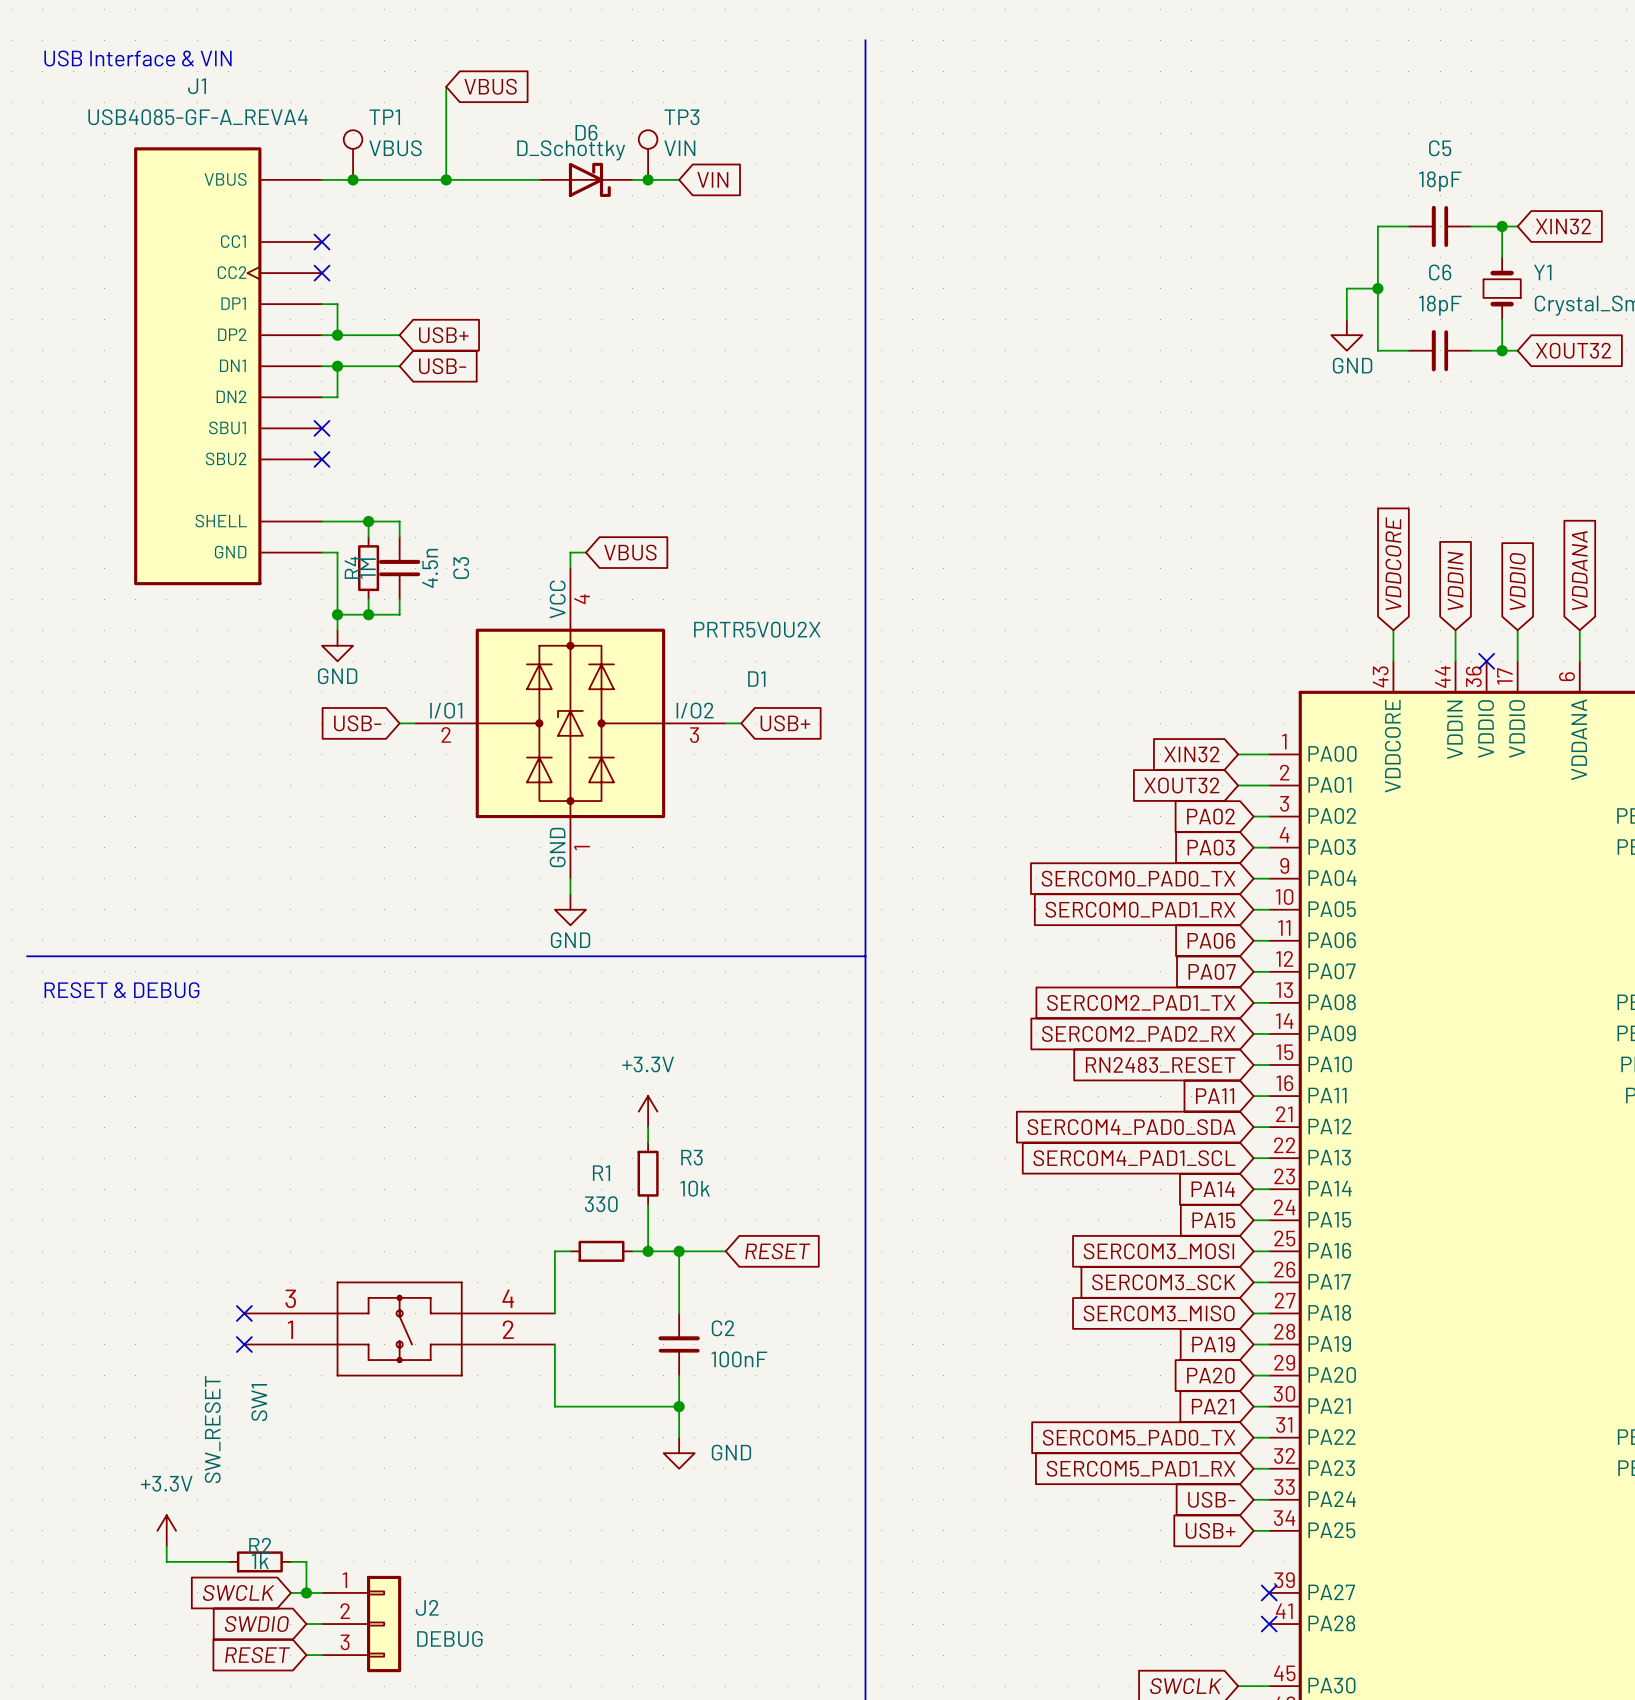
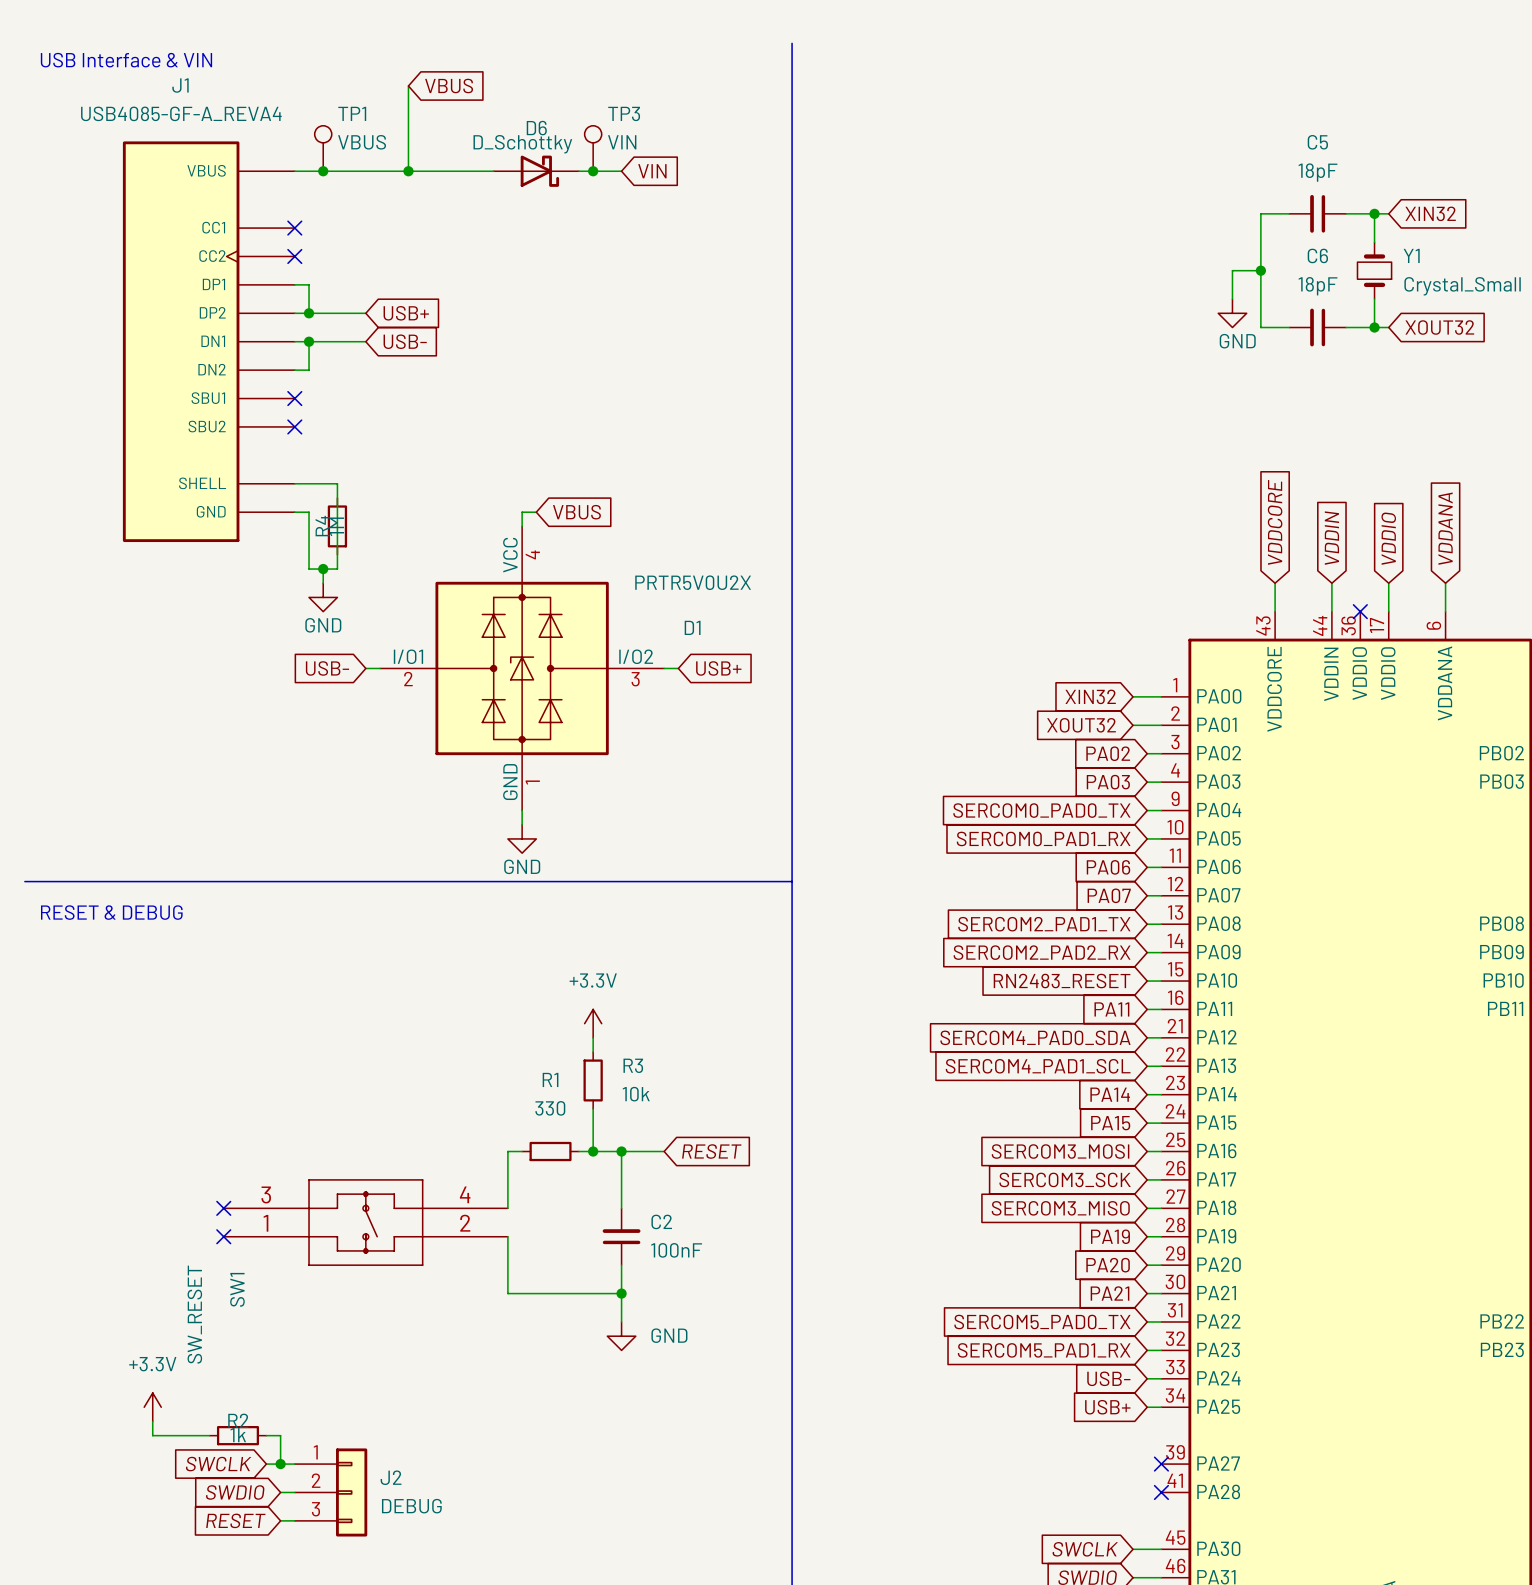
wire: (368, 521) (399, 521) (399, 537) -> none
junction: (368, 521) -> none
wire: none -> (337, 497) (337, 554)
C3: 4.5n (399, 568) -> none
wire: (399, 599) (399, 614) (368, 614) -> none
wire: (337, 614) (337, 630) -> (323, 569) (323, 583)
junction: (337, 614) -> none
junction: none -> (323, 569)
junction: (368, 614) -> none
power symbol position: GND (337, 645) -> GND (323, 597)

